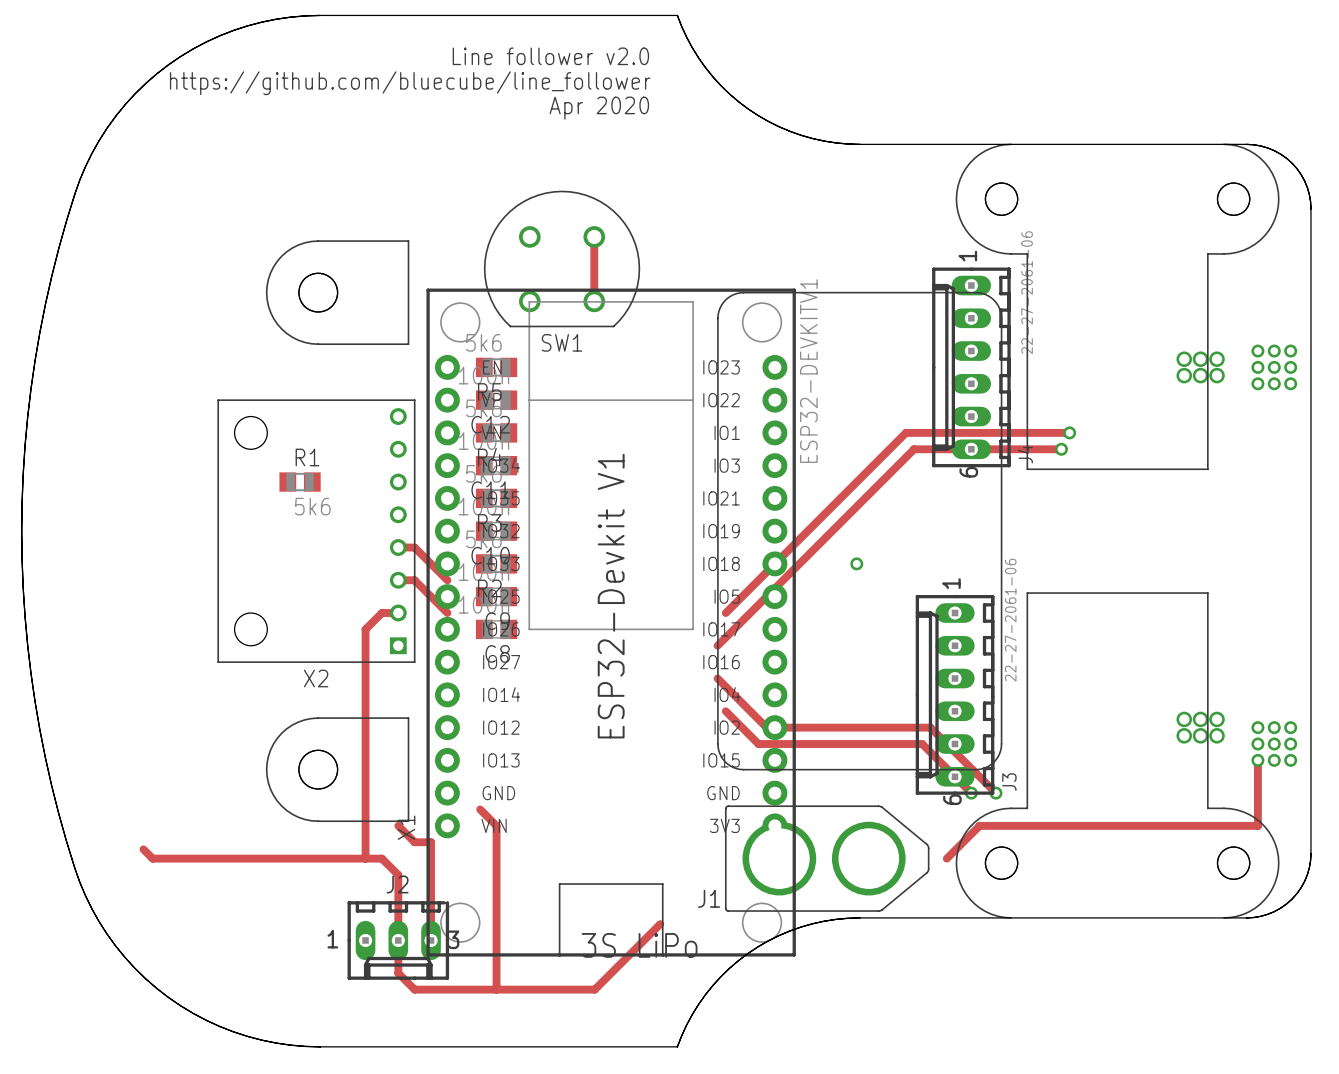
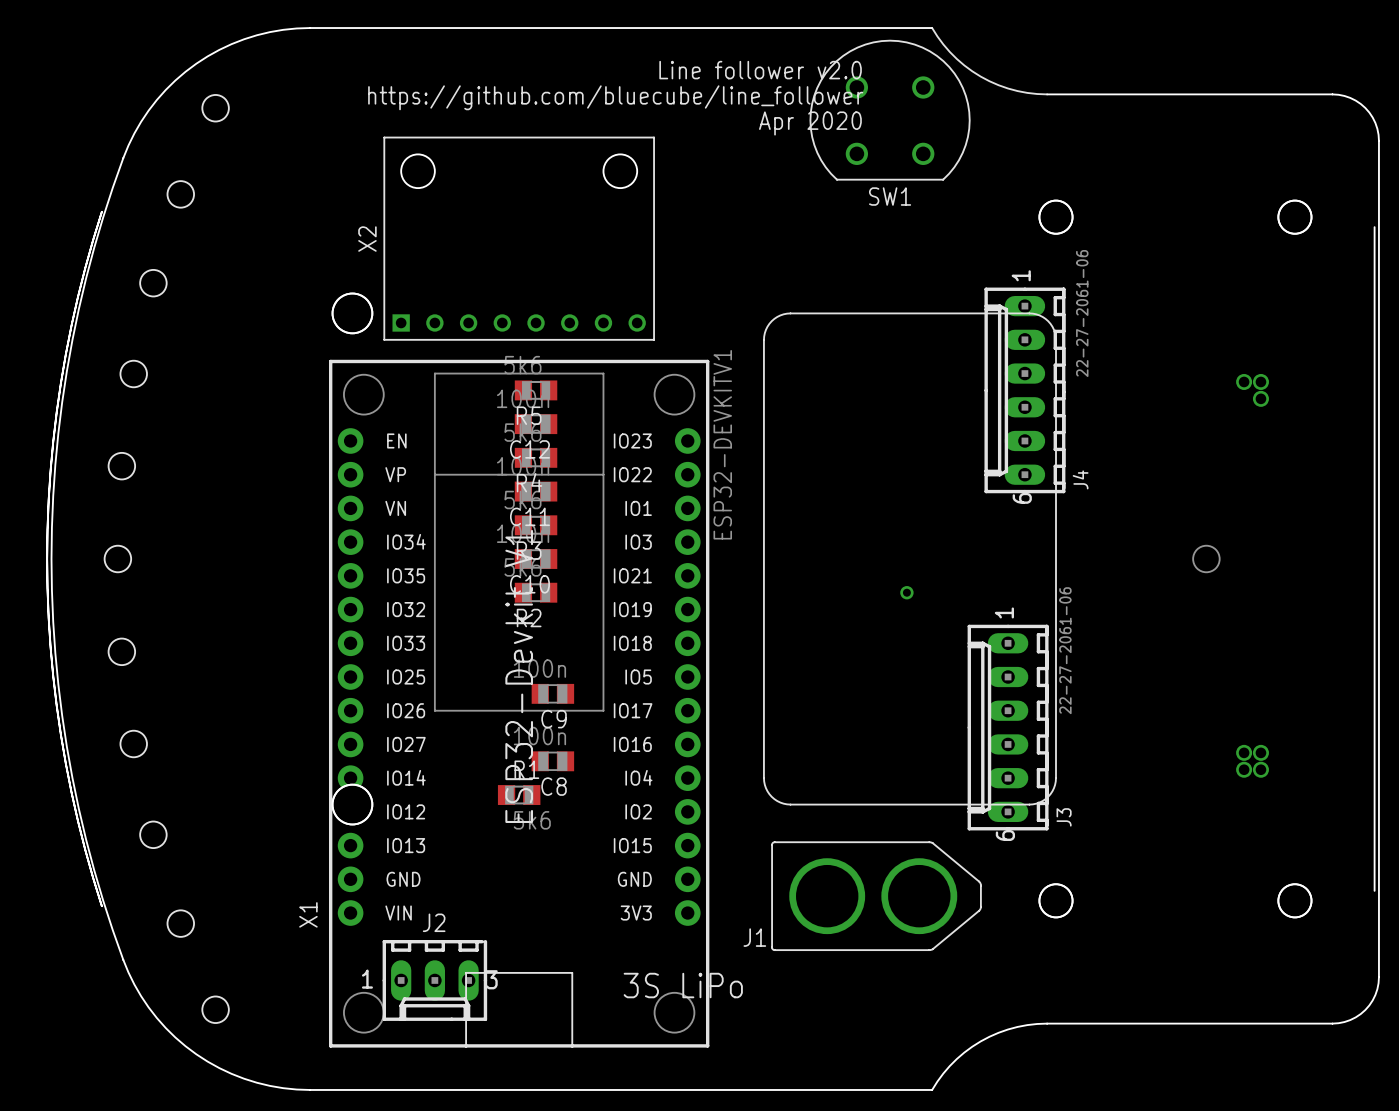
board edge: (320, 15) (276, 19) (247, 25) (206, 41) (168, 64) (135, 93) (107, 127) (92, 153) (74, 193) (79, 180) (92, 153) (99, 140) (107, 127) (125, 104) (135, 93) (145, 83) (168, 64) (193, 48) (206, 41) (219, 35) (247, 25) (261, 22) (276, 19) (305, 15) (320, 15) -> (354, 28) (283, 29) (256, 35) (219, 49) (185, 71) (165, 89) (148, 110) (134, 133) (123, 157) (103, 217) (86, 278) (72, 339) (62, 401) (55, 464) (51, 559) (55, 653) (62, 716) (72, 778) (86, 839) (103, 900) (123, 960) (134, 984) (148, 1007) (165, 1028) (196, 1054) (219, 1068) (256, 1082) (283, 1088) (354, 1089)
board edge: none -> (722, 28) (932, 28)
line: none -> (932, 28) (949, 51) (980, 76) (1017, 91) (1047, 94)
text position: Line follower v2.0 (550, 56) -> Line follower v2.0 (760, 70)
board edge: none -> (1047, 94) (1338, 94) (1350, 97) (1360, 103) (1369, 112) (1375, 123) (1378, 140) (1378, 977) (1377, 989) (1372, 1000) (1365, 1010) (1350, 1020) (1338, 1023) (1047, 1023) (1017, 1026) (989, 1036) (972, 1046) (949, 1066) (932, 1089) (722, 1089)
drawing: none -> [202, 94, 229, 122]
text position: https://github.com/bluecube/line_follower (410, 83) -> https://github.com/bluecube/line_follower (615, 97)
text position: Apr 2020 (599, 108) -> Apr 2020 (810, 123)
board edge: (859, 144) (1246, 144) -> none
board edge: (859, 144) (835, 142) (801, 135) (778, 126) (748, 108) (720, 85) (705, 67) (692, 47) (677, 15) (681, 26) (692, 47) (698, 57) (705, 67) (712, 76) (720, 85) (738, 101) (748, 108) (768, 121) (778, 126) (789, 131) (801, 135) (812, 138) (835, 142) (847, 144) (859, 144) -> none
line: (1011, 144) (998, 145) (985, 150) (970, 162) (959, 179) (956, 199) (958, 212) (962, 224) (970, 235) (980, 244) (998, 252) (1027, 253) (1027, 469) (1207, 469) (1207, 253) (1237, 252) (1255, 244) (1264, 235) (1272, 224) (1277, 212) (1278, 199) (1275, 179) (1264, 162) (1249, 150) (1237, 145) (1223, 144) -> none
board edge: (1246, 144) (1267, 147) (1280, 154) (1292, 163) (1301, 174) (1307, 187) (1310, 208) (1310, 201) (1307, 187) (1304, 180) (1301, 174) (1296, 168) (1292, 163) (1286, 158) (1280, 154) (1274, 150) (1267, 147) (1253, 144) (1246, 144) -> none
drawing: none -> [167, 181, 195, 208]
track: (594, 236) (594, 301) -> none
line: (318, 241) (408, 241) (408, 344) (311, 343) (292, 337) (277, 324) (270, 312) (267, 299) (267, 285) (273, 266) (281, 256) (292, 247) (304, 242) (318, 241) -> none
drawing: none -> [140, 269, 167, 297]
SW1 position: (562, 258) -> (890, 110)
drawing: none -> [120, 360, 148, 388]
via: (1257, 351) -> none
via: (1274, 351) -> none
via: (1290, 351) -> none
via: (1216, 359) -> none
via: (1257, 367) -> none
via: (1274, 367) -> none
via: (1290, 367) -> none
via: (1184, 375) -> none
via: (1216, 375) -> none
via: (1257, 383) -> none
via: (1274, 383) -> none
via: (1290, 383) -> none
drawing: none -> [108, 452, 136, 480]
track: (1069, 432) (905, 432) (725, 613) -> none
via: (1069, 432) -> none
track: (1061, 449) (914, 449) (717, 645) -> none
via: (1061, 449) -> none
R1 position: (300, 482) -> (519, 795)
drawing: none -> [104, 545, 132, 573]
drawing: none -> [1193, 545, 1220, 573]
X2 rotation: 0° (316, 531) -> 90° clockwise (519, 238)
X2 position: (316, 531) -> (519, 238)
track: (398, 547) (414, 547) (447, 580) -> none
track: (398, 580) (414, 580) (447, 613) -> none
C9 position: (496, 596) -> (552, 693)
drawing: none -> [108, 638, 136, 666]
track: (398, 613) (381, 613) (365, 629) (365, 858) -> none
X1 position: (611, 622) -> (519, 703)
C8 position: (496, 629) -> (552, 761)
track: (717, 678) (766, 727) (930, 727) (995, 793) -> none
drawing: none -> [120, 730, 148, 758]
track: (725, 711) (758, 744) (922, 744) (971, 793) -> none
line: (318, 718) (408, 718) (408, 821) (311, 820) (292, 814) (277, 801) (270, 789) (267, 776) (267, 762) (273, 743) (281, 733) (292, 725) (304, 719) (318, 718) -> none
via: (1216, 719) -> none
via: (1257, 727) -> none
via: (1274, 727) -> none
via: (1290, 727) -> none
via: (1216, 735) -> none
via: (1257, 744) -> none
via: (1274, 744) -> none
via: (1290, 744) -> none
track: (1257, 760) (1257, 825) (979, 825) (946, 858) -> none
via: (1257, 760) -> none
via: (1274, 760) -> none
via: (1290, 760) -> none
drawing: none -> [140, 821, 167, 849]
via: (971, 793) -> none
via: (995, 793) -> none
track: (480, 809) (496, 825) (496, 989) -> none
track: (398, 825) (414, 842) (431, 842) (431, 940) -> none
track: (143, 849) (152, 858) (381, 858) (398, 874) (398, 973) (414, 989) (594, 989) (660, 924) -> none
board edge: (74, 868) (92, 909) (107, 934) (135, 968) (168, 997) (206, 1020) (247, 1036) (276, 1043) (320, 1046) (305, 1046) (276, 1043) (261, 1040) (247, 1036) (219, 1026) (206, 1020) (193, 1013) (168, 997) (145, 978) (135, 968) (125, 957) (107, 934) (99, 921) (92, 909) (79, 882) (74, 868) -> none
drawing: none -> [167, 910, 195, 937]
board edge: (859, 917) (1246, 917) -> none
board edge: (859, 917) (835, 919) (801, 927) (778, 935) (748, 953) (720, 976) (705, 994) (692, 1014) (677, 1046) (681, 1035) (692, 1014) (698, 1004) (705, 994) (712, 985) (720, 976) (738, 960) (748, 953) (758, 946) (778, 935) (789, 930) (801, 927) (812, 923) (835, 919) (847, 918) (859, 917) -> none
line: (1011, 917) (998, 916) (985, 911) (970, 899) (959, 882) (956, 863) (958, 850) (962, 837) (970, 826) (980, 818) (998, 809) (1027, 808) (1027, 593) (1207, 593) (1207, 808) (1237, 809) (1255, 818) (1264, 826) (1272, 837) (1277, 850) (1278, 863) (1275, 882) (1264, 899) (1249, 911) (1237, 916) (1223, 917) -> none
board edge: (1246, 917) (1267, 914) (1280, 908) (1292, 899) (1301, 887) (1307, 874) (1310, 853) (1310, 860) (1307, 874) (1304, 881) (1301, 887) (1296, 893) (1292, 899) (1286, 903) (1280, 908) (1274, 911) (1267, 914) (1253, 917) (1246, 917) -> none
drawing: none -> [202, 996, 229, 1024]

